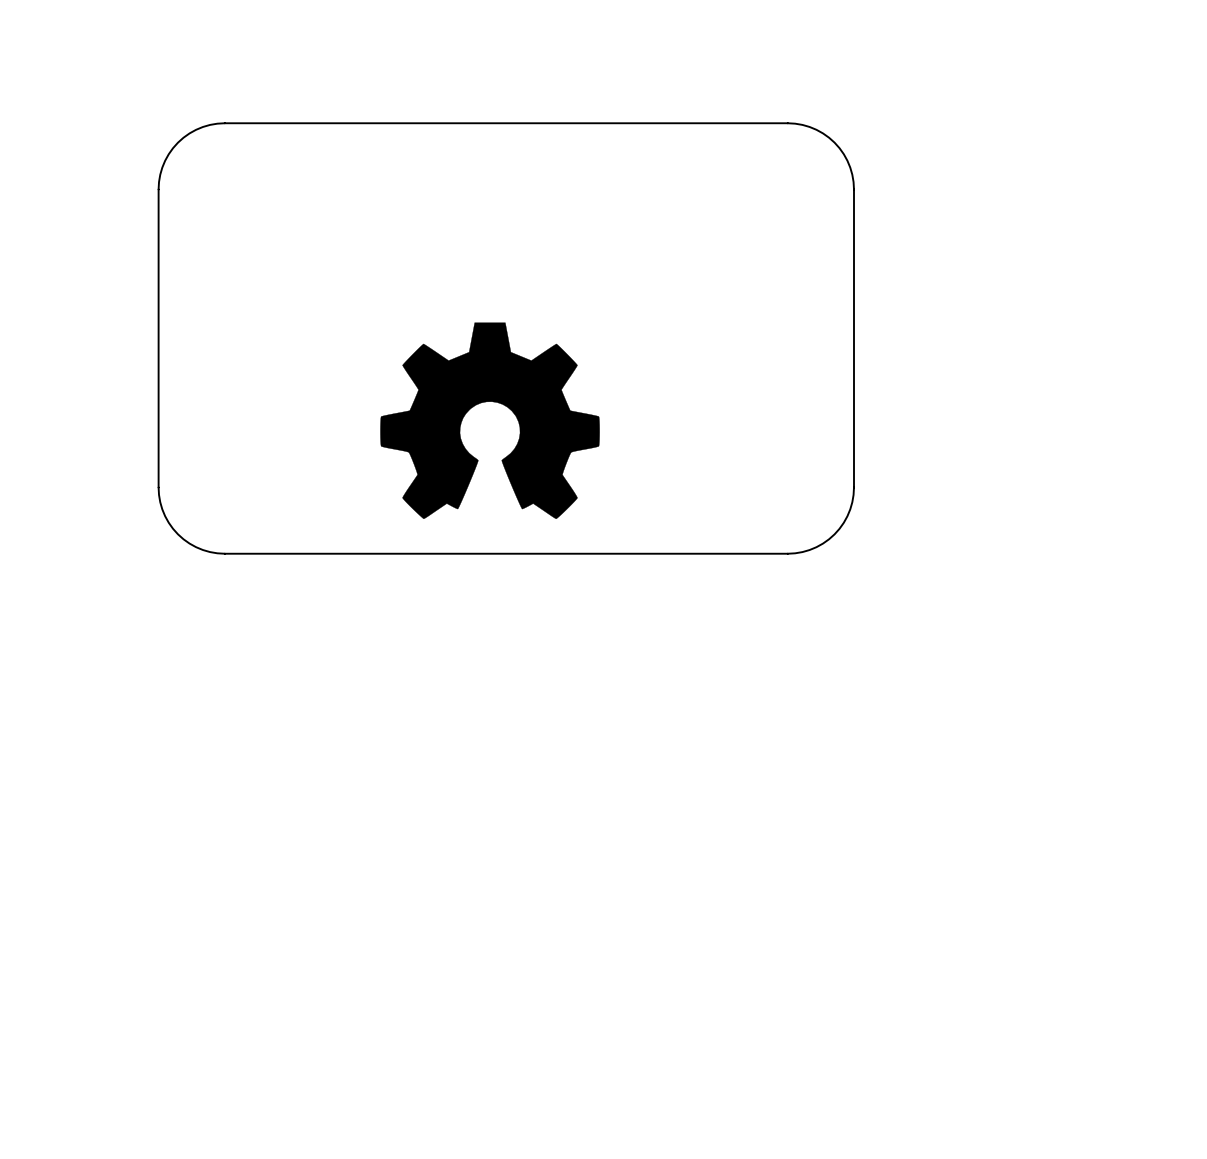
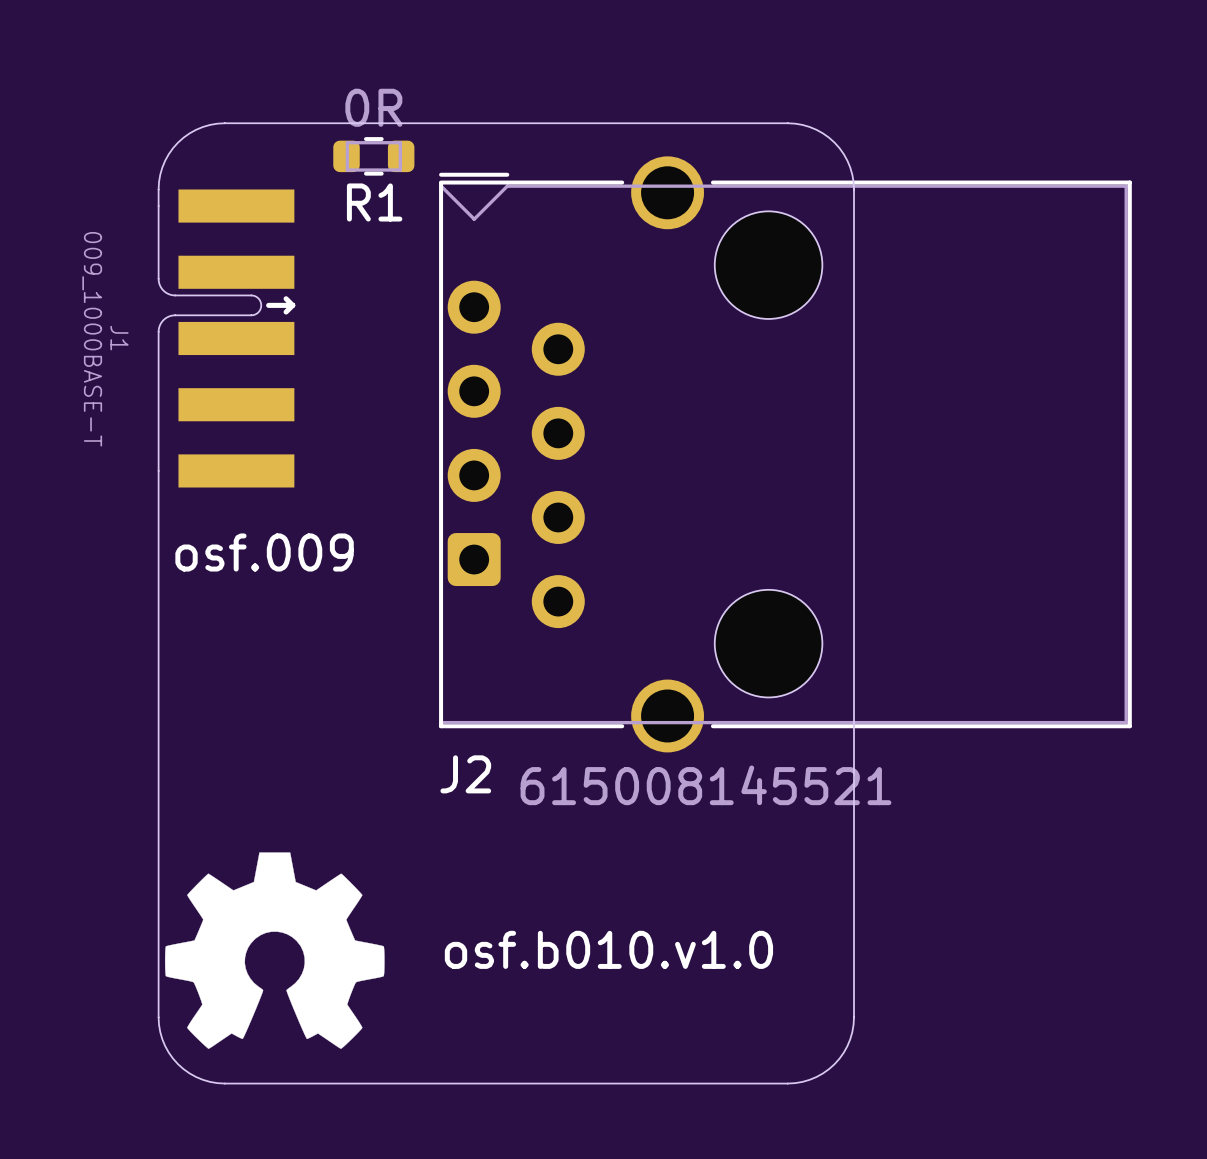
R1: none -> 0R (373, 156)
board edge: (158, 206) (158, 470) -> none
J1: none -> 009_1000BASE-T (226, 338)
drawing position: (490, 420) -> (274, 950)
J2: none -> 615008145521 (785, 454)
board edge: (158, 487) (160, 502) (165, 516) (178, 534) (189, 543) (202, 550) (224, 553) (795, 553) (816, 547) (829, 539) (839, 528) (850, 509) (853, 487) -> (158, 487) (159, 1024) (162, 1039) (168, 1052) (183, 1069) (202, 1079) (224, 1083) (787, 1083) (802, 1081) (816, 1077) (834, 1064) (847, 1046) (852, 1032) (853, 1017) (853, 487)
text: none -> osf.009 (264, 552)
text: none -> osf.b010.v1.0 (608, 949)

